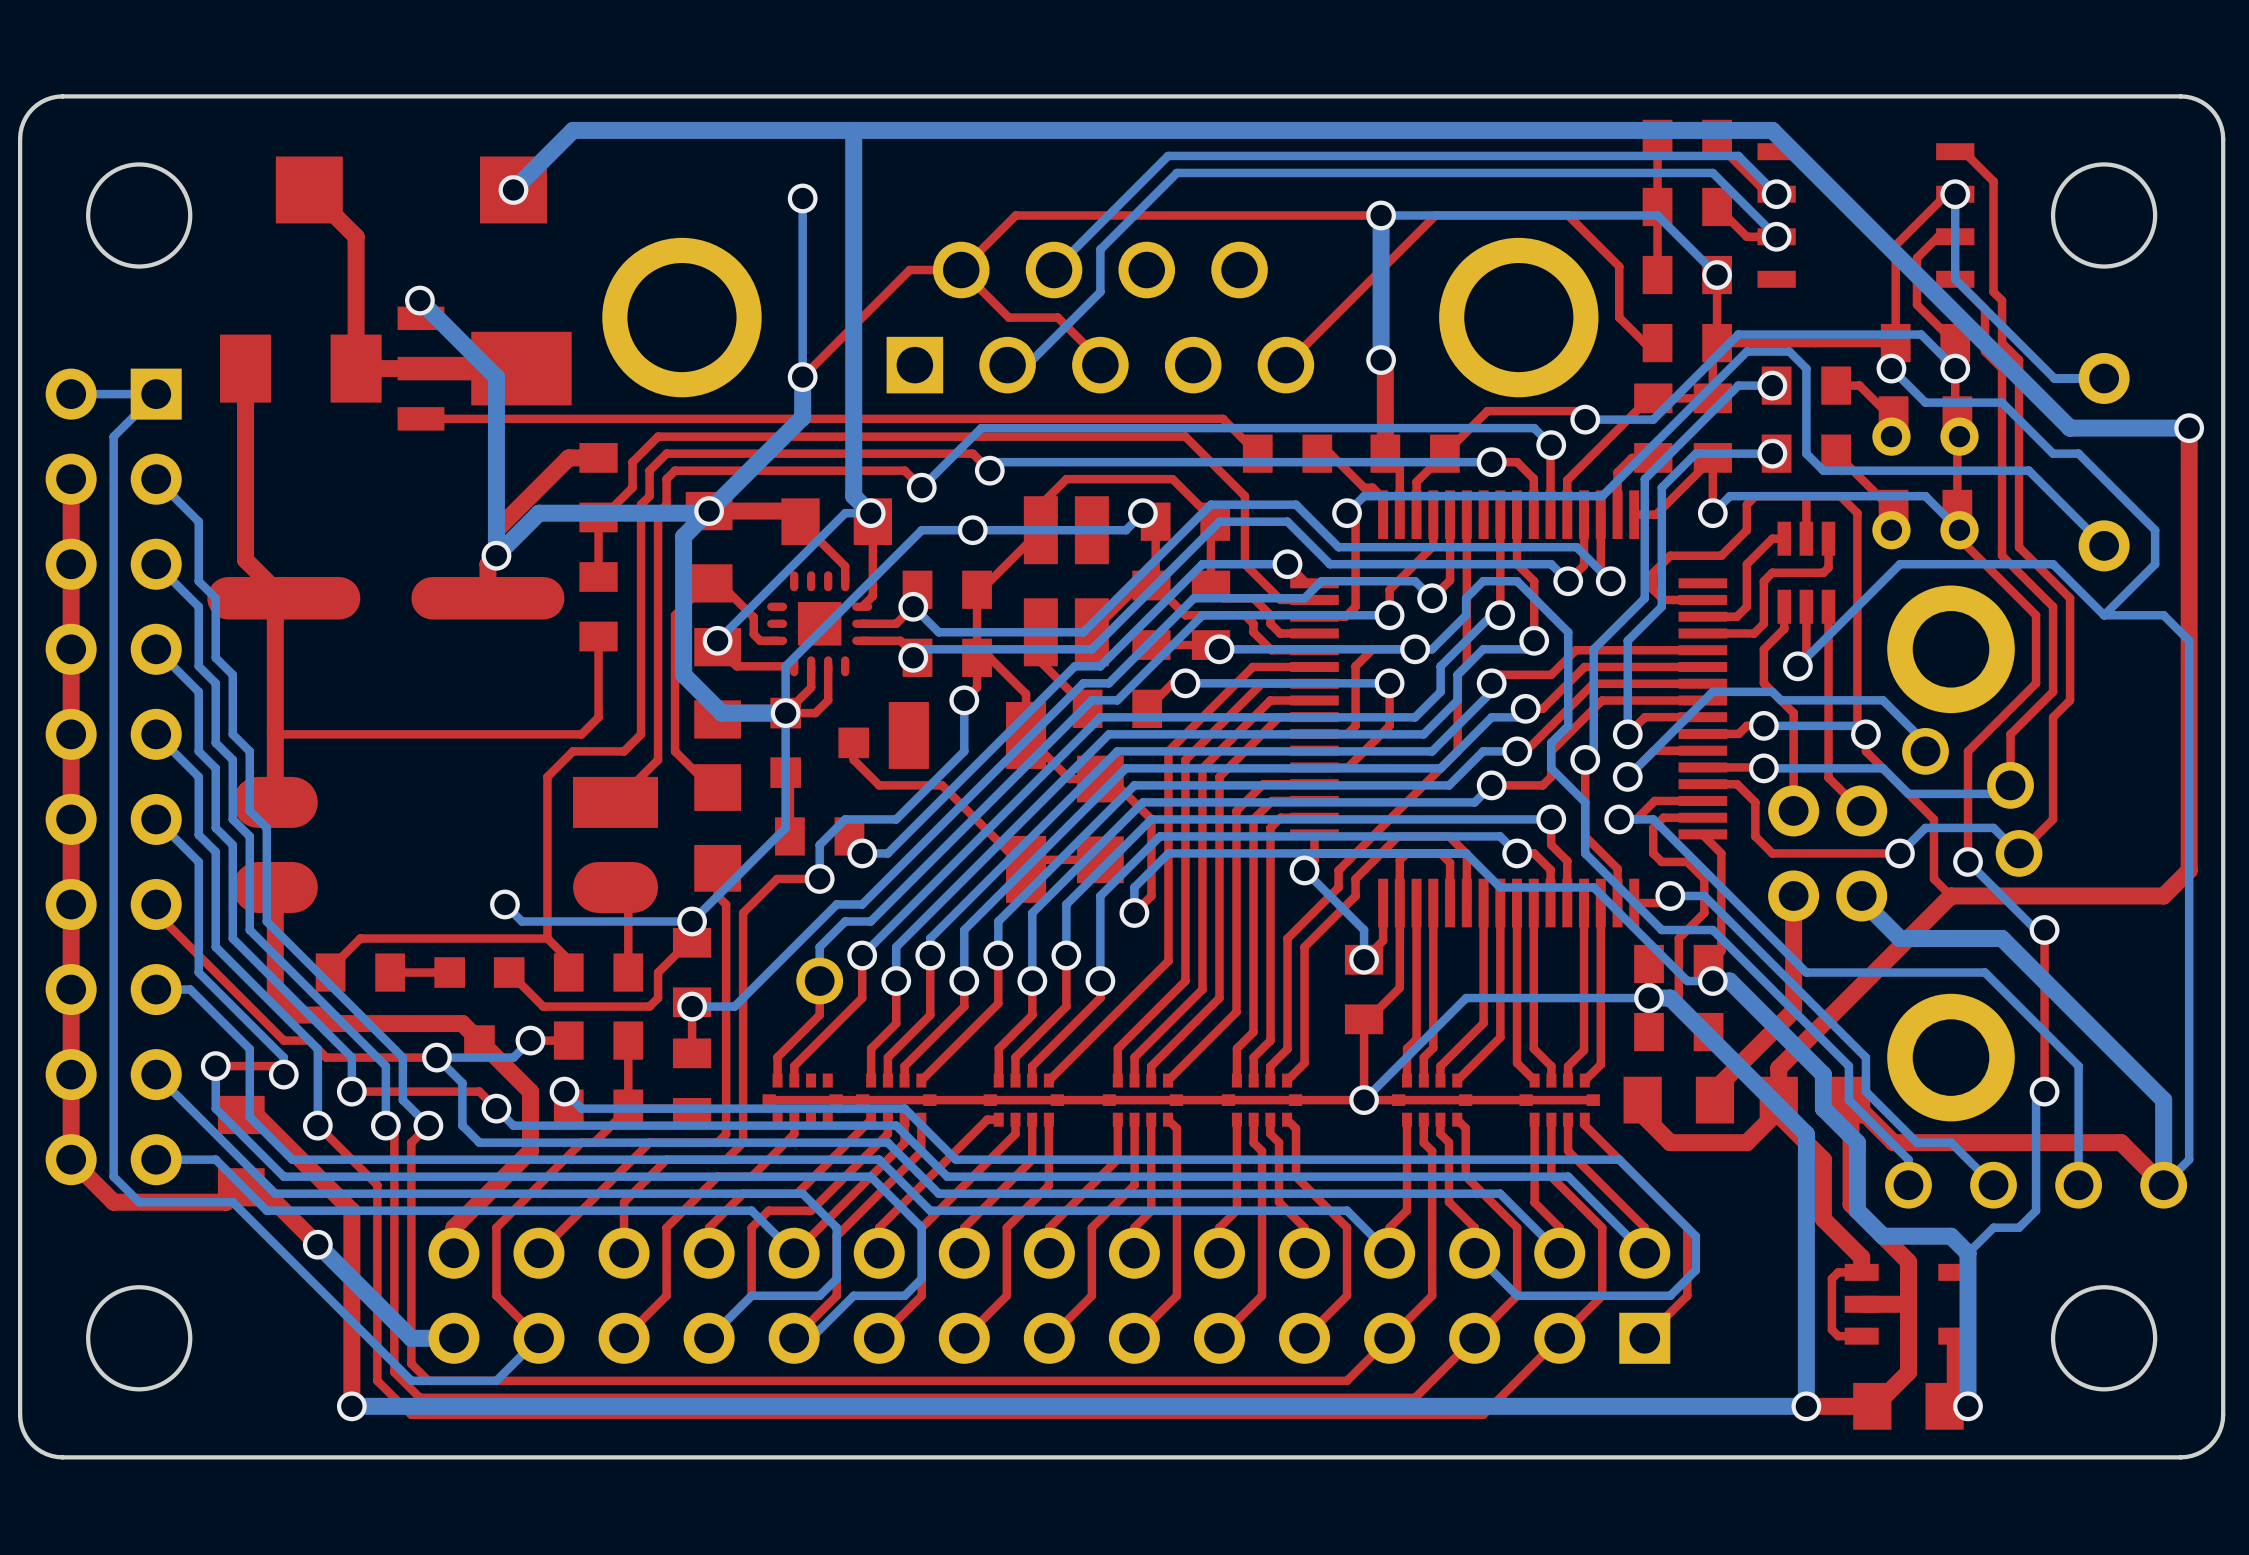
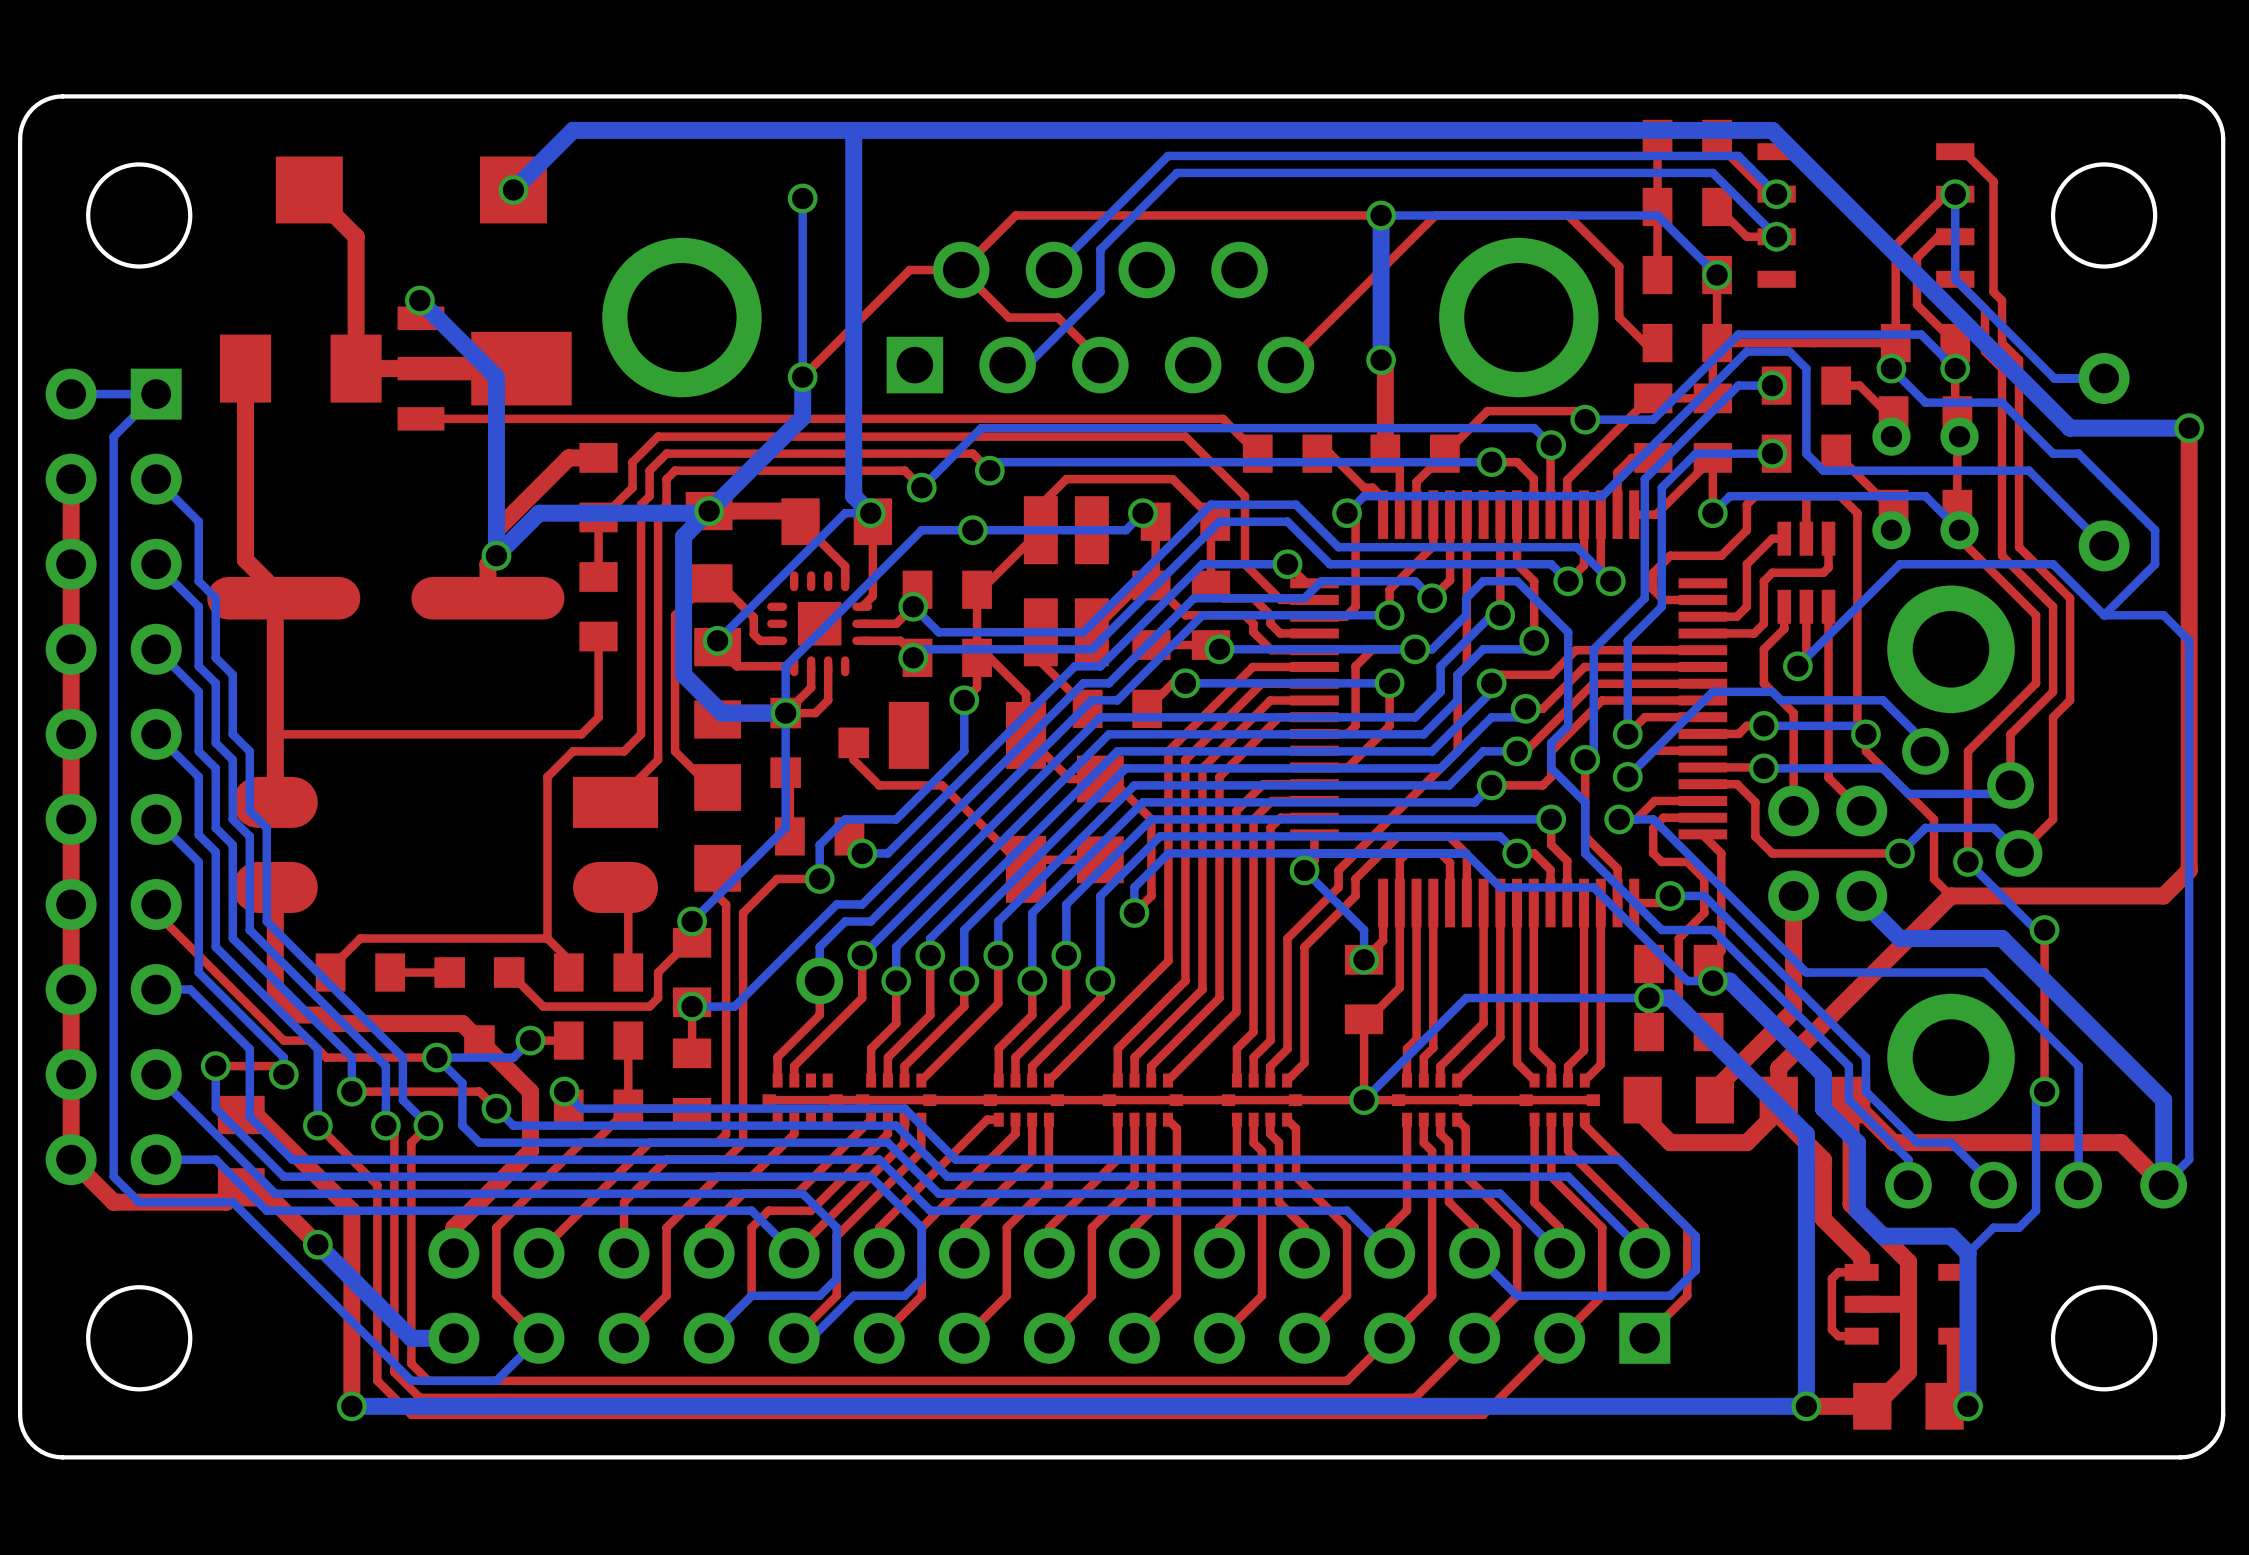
bottom track: (504, 904) (521, 921) (692, 921) -> none
via: (504, 904) -> none

